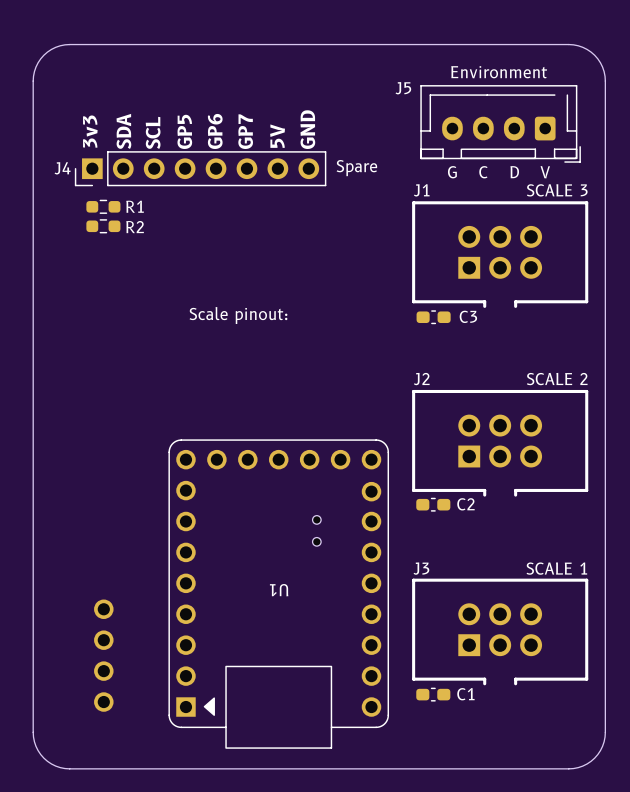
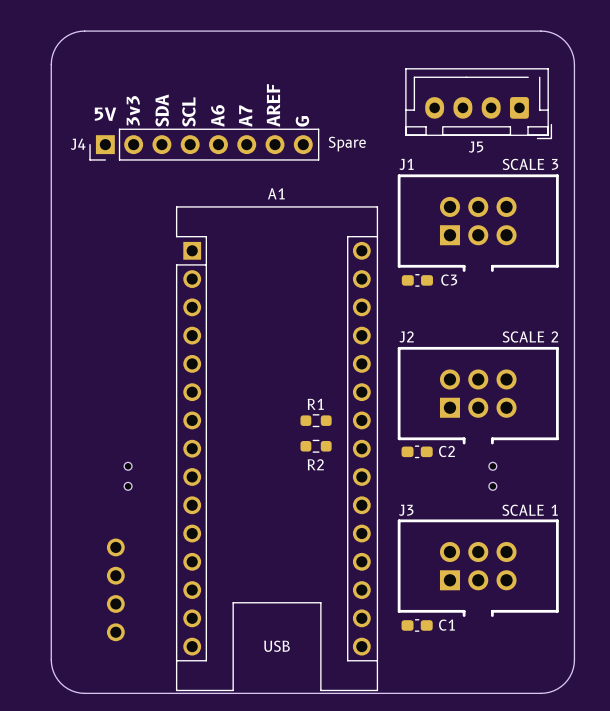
J5 value: Environment (499, 72) -> none
J5 name position: J5 (403, 88) -> J5 (476, 147)
text: none -> AREF (273, 105)
text: GND (307, 129) -> G (302, 121)
text: 3v3 (90, 131) -> none
text: SDA (123, 131) -> 3v3 (133, 110)
text: GP5 (184, 131) -> SCL (188, 111)
text: GP6 (215, 131) -> A6 (217, 115)
text: GP7 (245, 131) -> A7 (245, 116)
text: SCL (153, 132) -> SDA (162, 110)
text rotation: 0° (277, 136) -> 90° clockwise (105, 114)
text position: 5V (277, 136) -> 5V (105, 114)
text: G (452, 172) -> none
text: C (483, 172) -> none
text: D (514, 172) -> none
text: V (545, 172) -> none
R2 position: (103, 206) -> (316, 446)
R1 name position: R1 (135, 206) -> R1 (315, 404)
R1 position: (103, 226) -> (316, 420)
R2 name position: R2 (135, 227) -> R2 (315, 464)
text: Scale pinout: (238, 315) -> none
A1: none -> (277, 448)
part: (316, 530) -> none
part: none -> (128, 476)
part: none -> (492, 476)
U1: (278, 594) -> none

